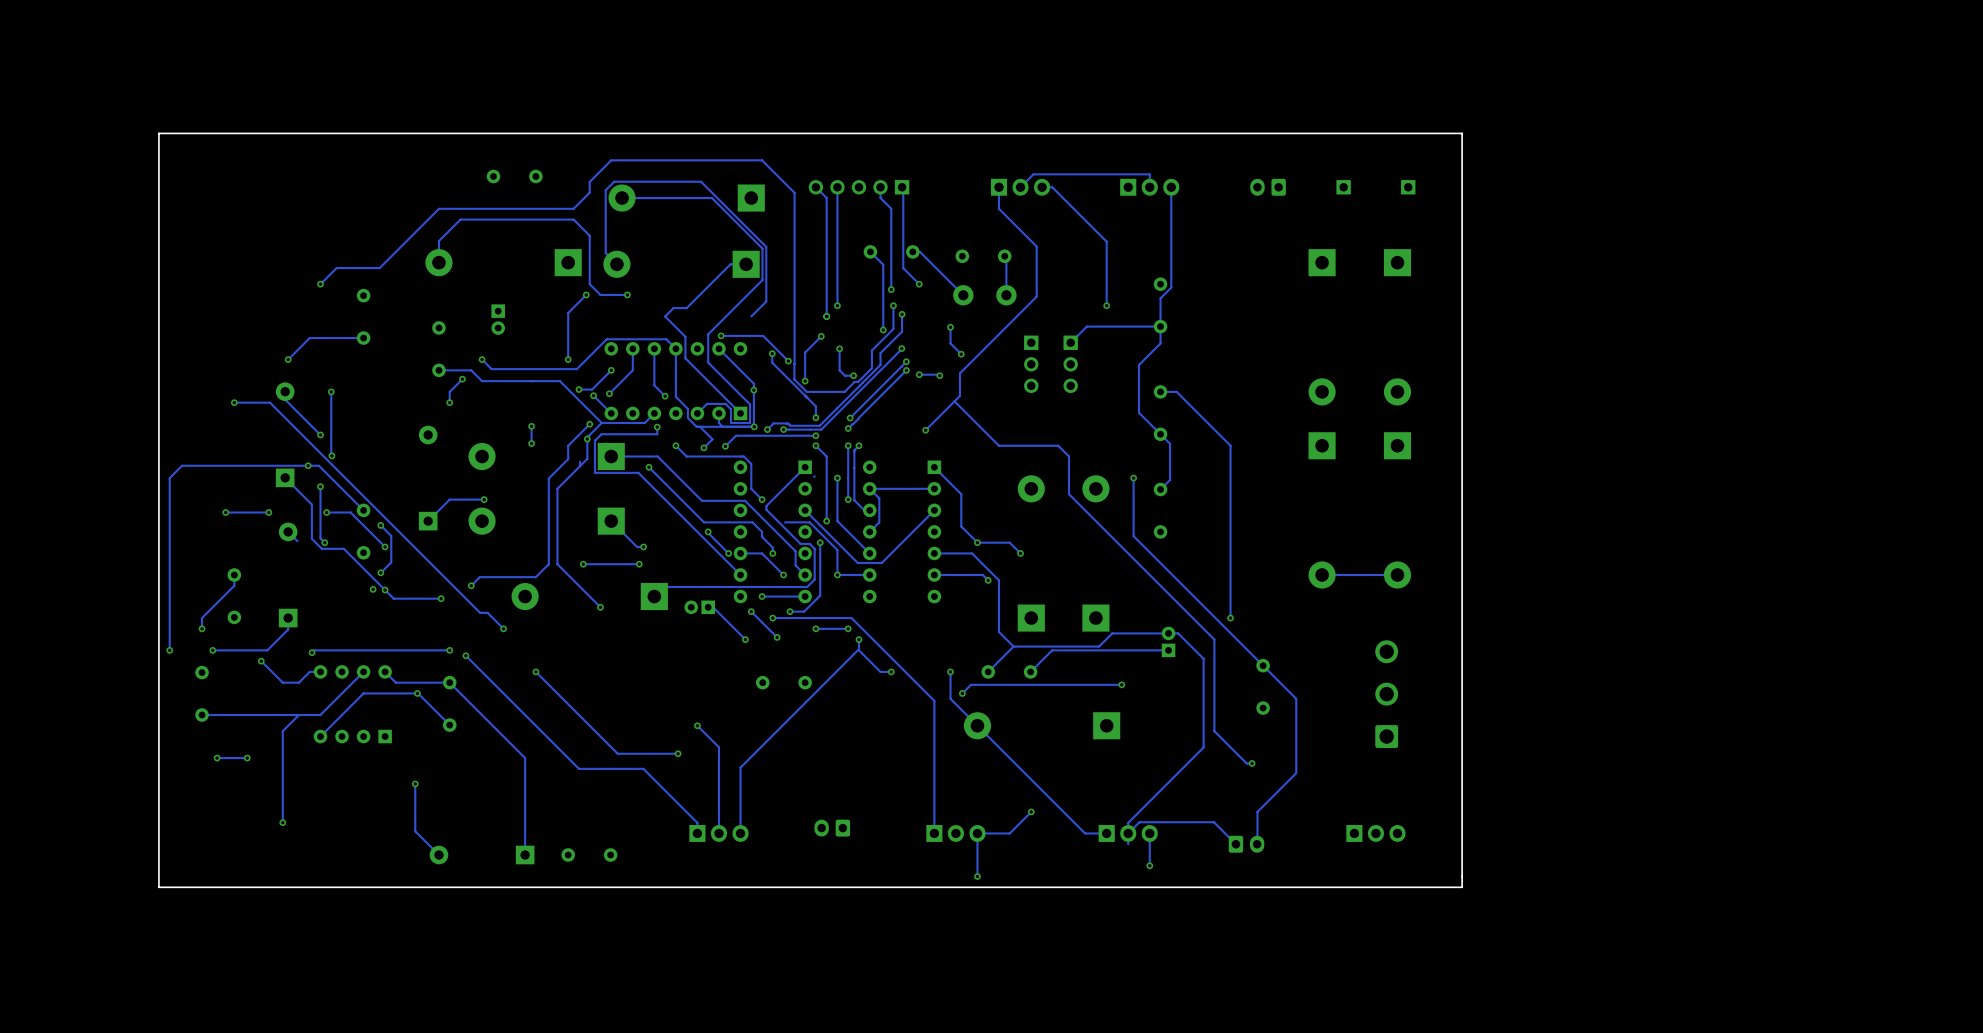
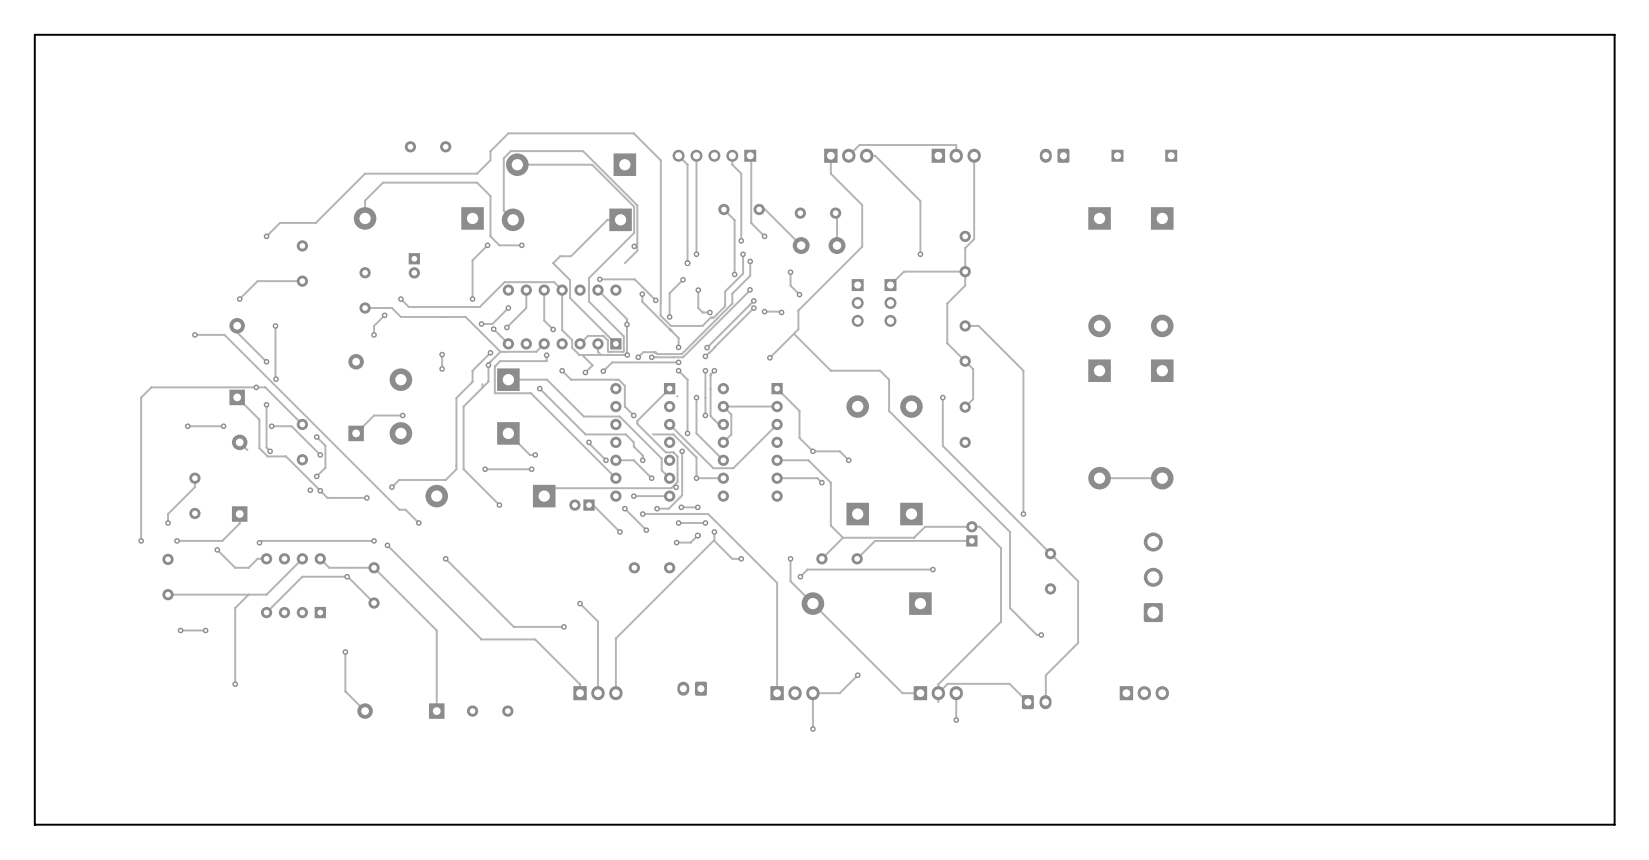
board edge: (1462, 133) (1462, 887) (158, 887) (158, 133) (1462, 133) -> (1614, 34) (1614, 824) (34, 824) (34, 34) (1614, 34)
via: none -> (634, 246)
via: none -> (676, 487)
via: none -> (681, 507)
track: none -> (697, 507) (681, 507)
via: none -> (697, 507)
track: none -> (697, 535) (690, 542) (676, 542)
via: none -> (697, 535)
via: none -> (676, 542)

